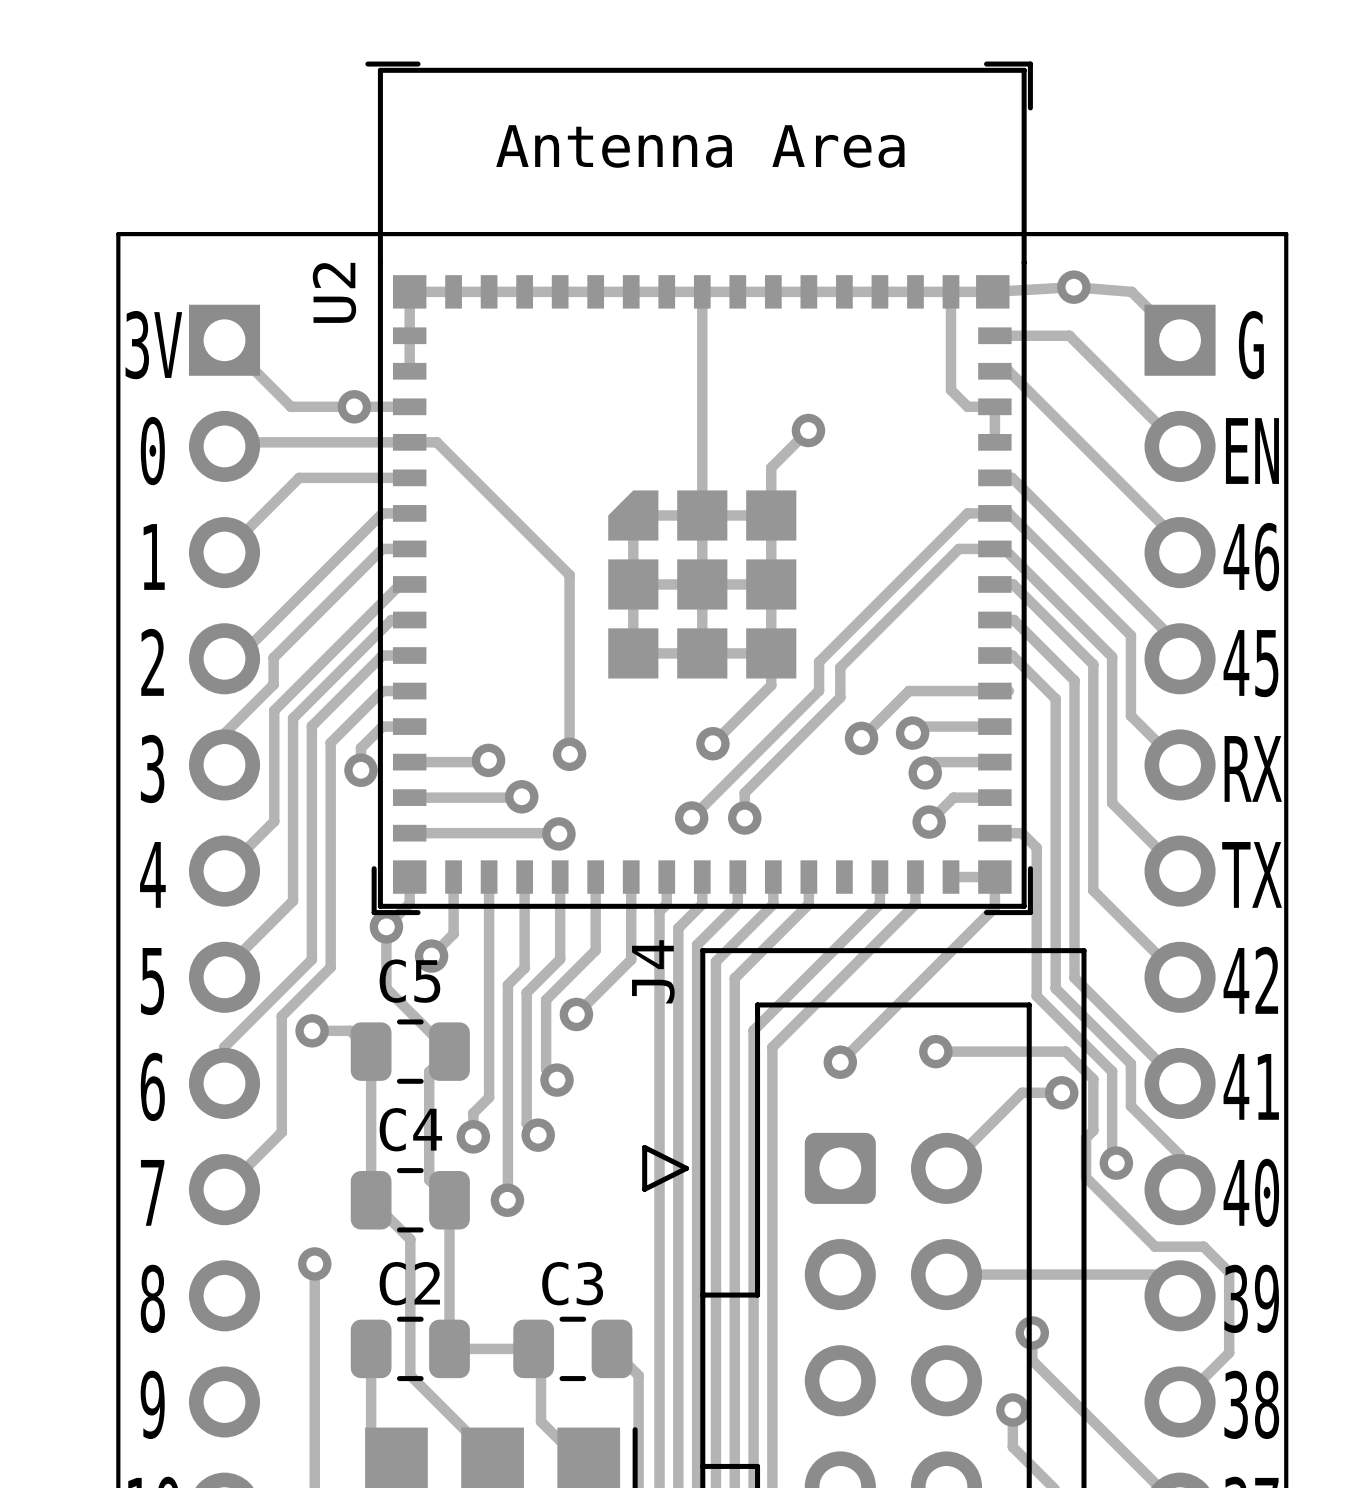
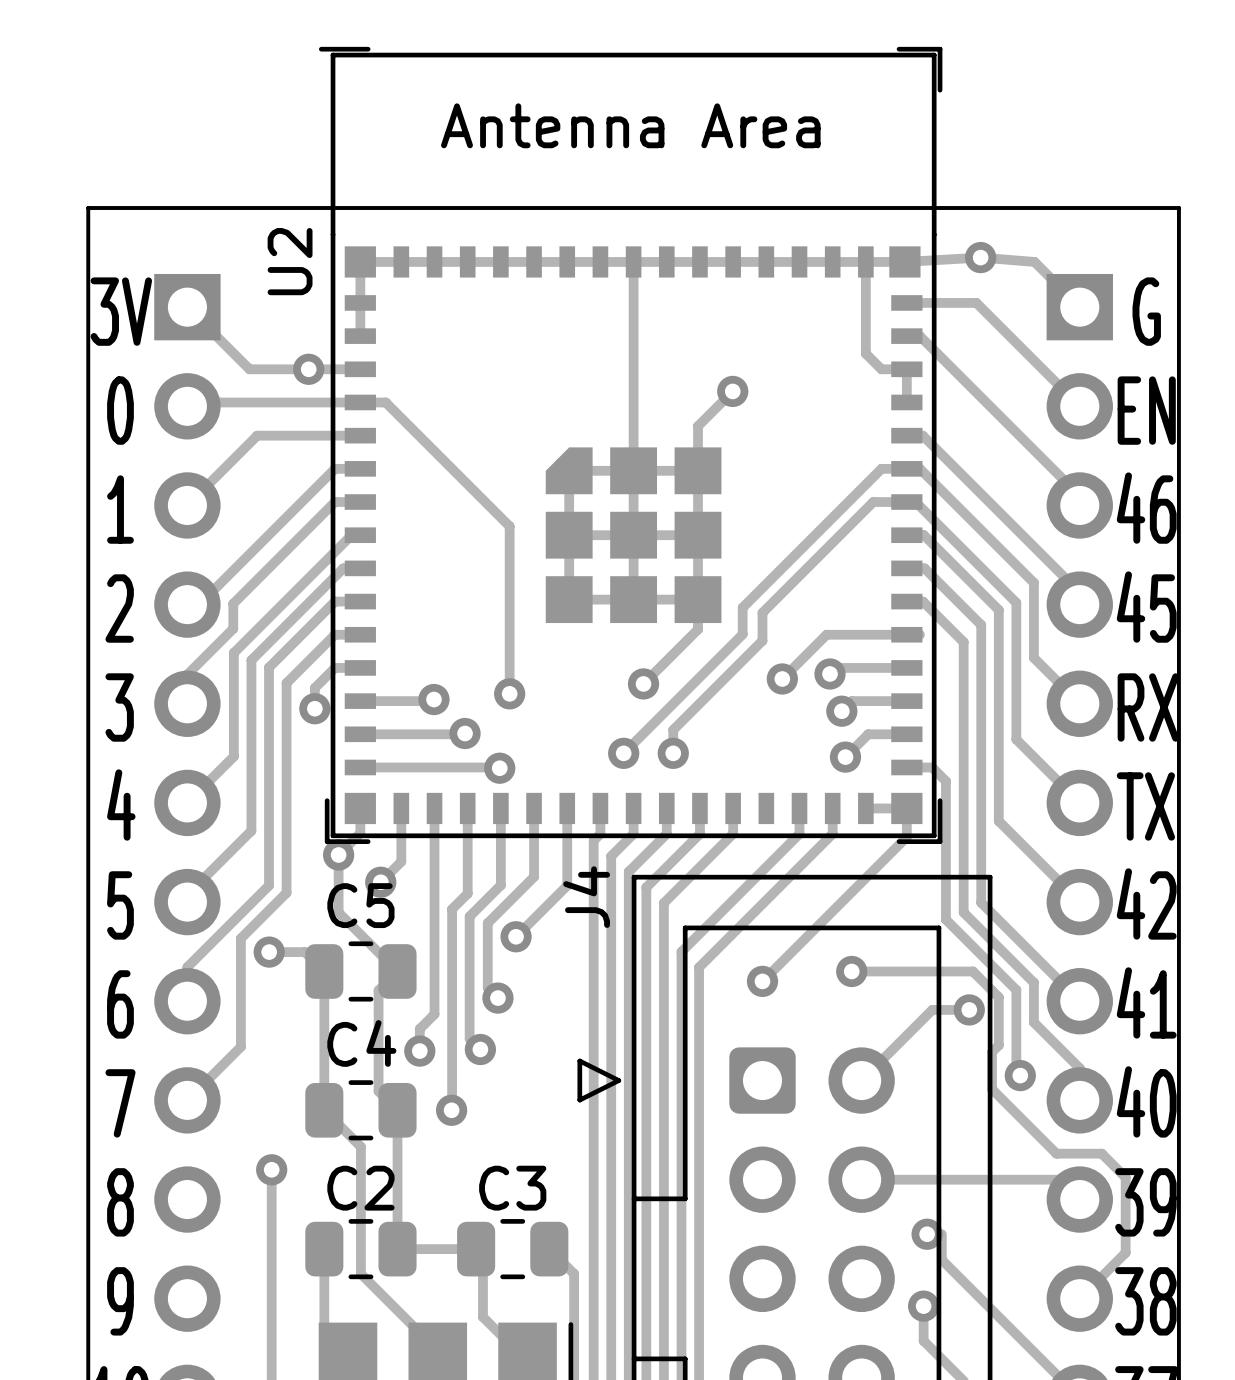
via position: (1032, 1332) -> (927, 1234)

